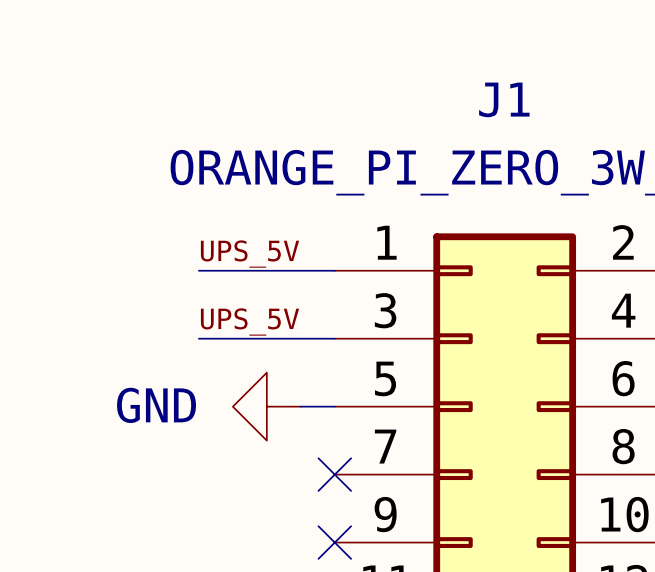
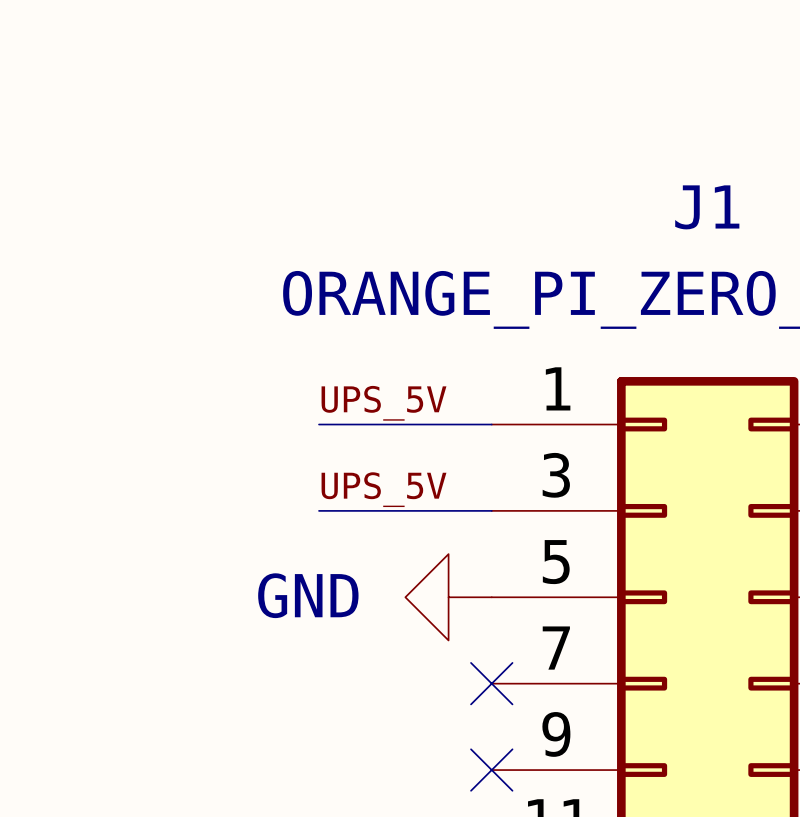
power symbol position: GND (266, 406) -> GND (448, 597)

